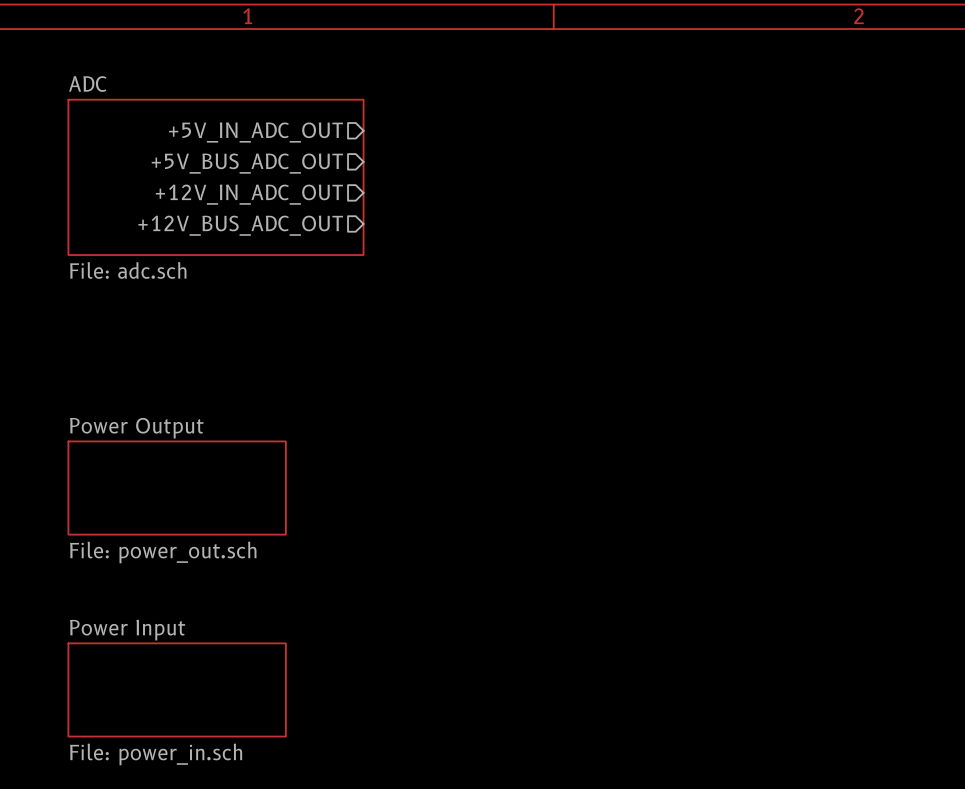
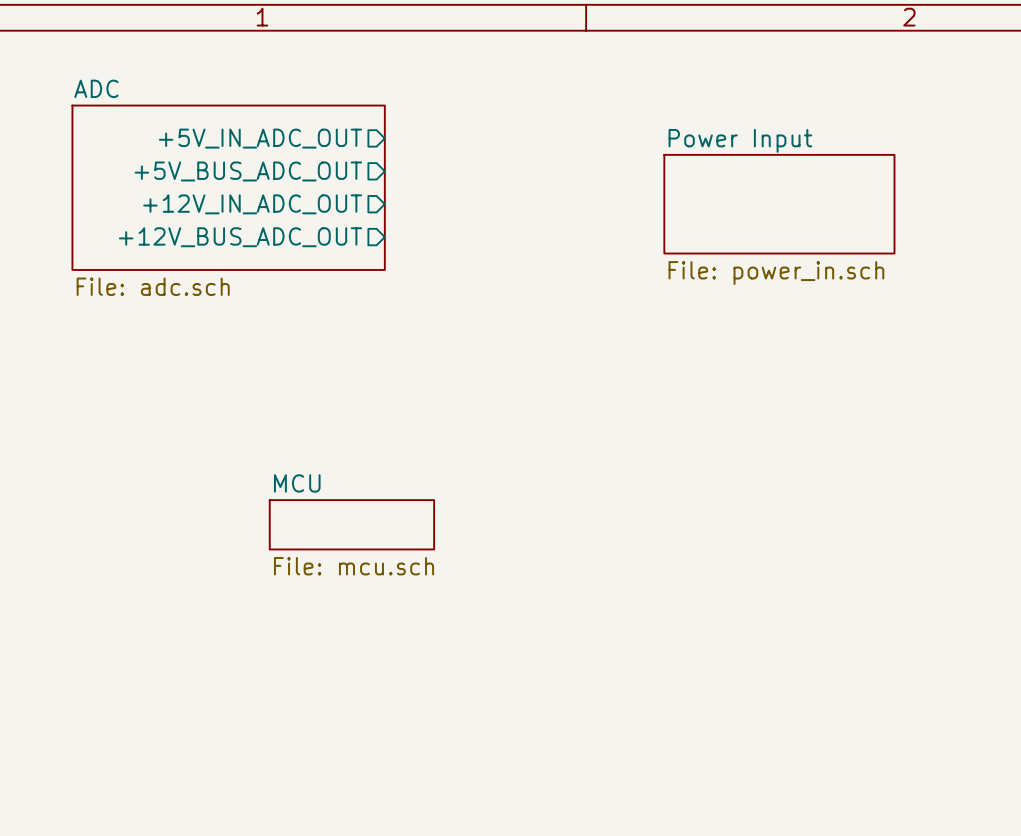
sheet Power Input: none -> File: power_in.sch (779, 204)
sheet Power Output: File: power_out.sch (177, 488) -> none
sheet MCU: none -> File: mcu.sch (351, 524)
sheet Power Input: File: power_in.sch (177, 689) -> none

